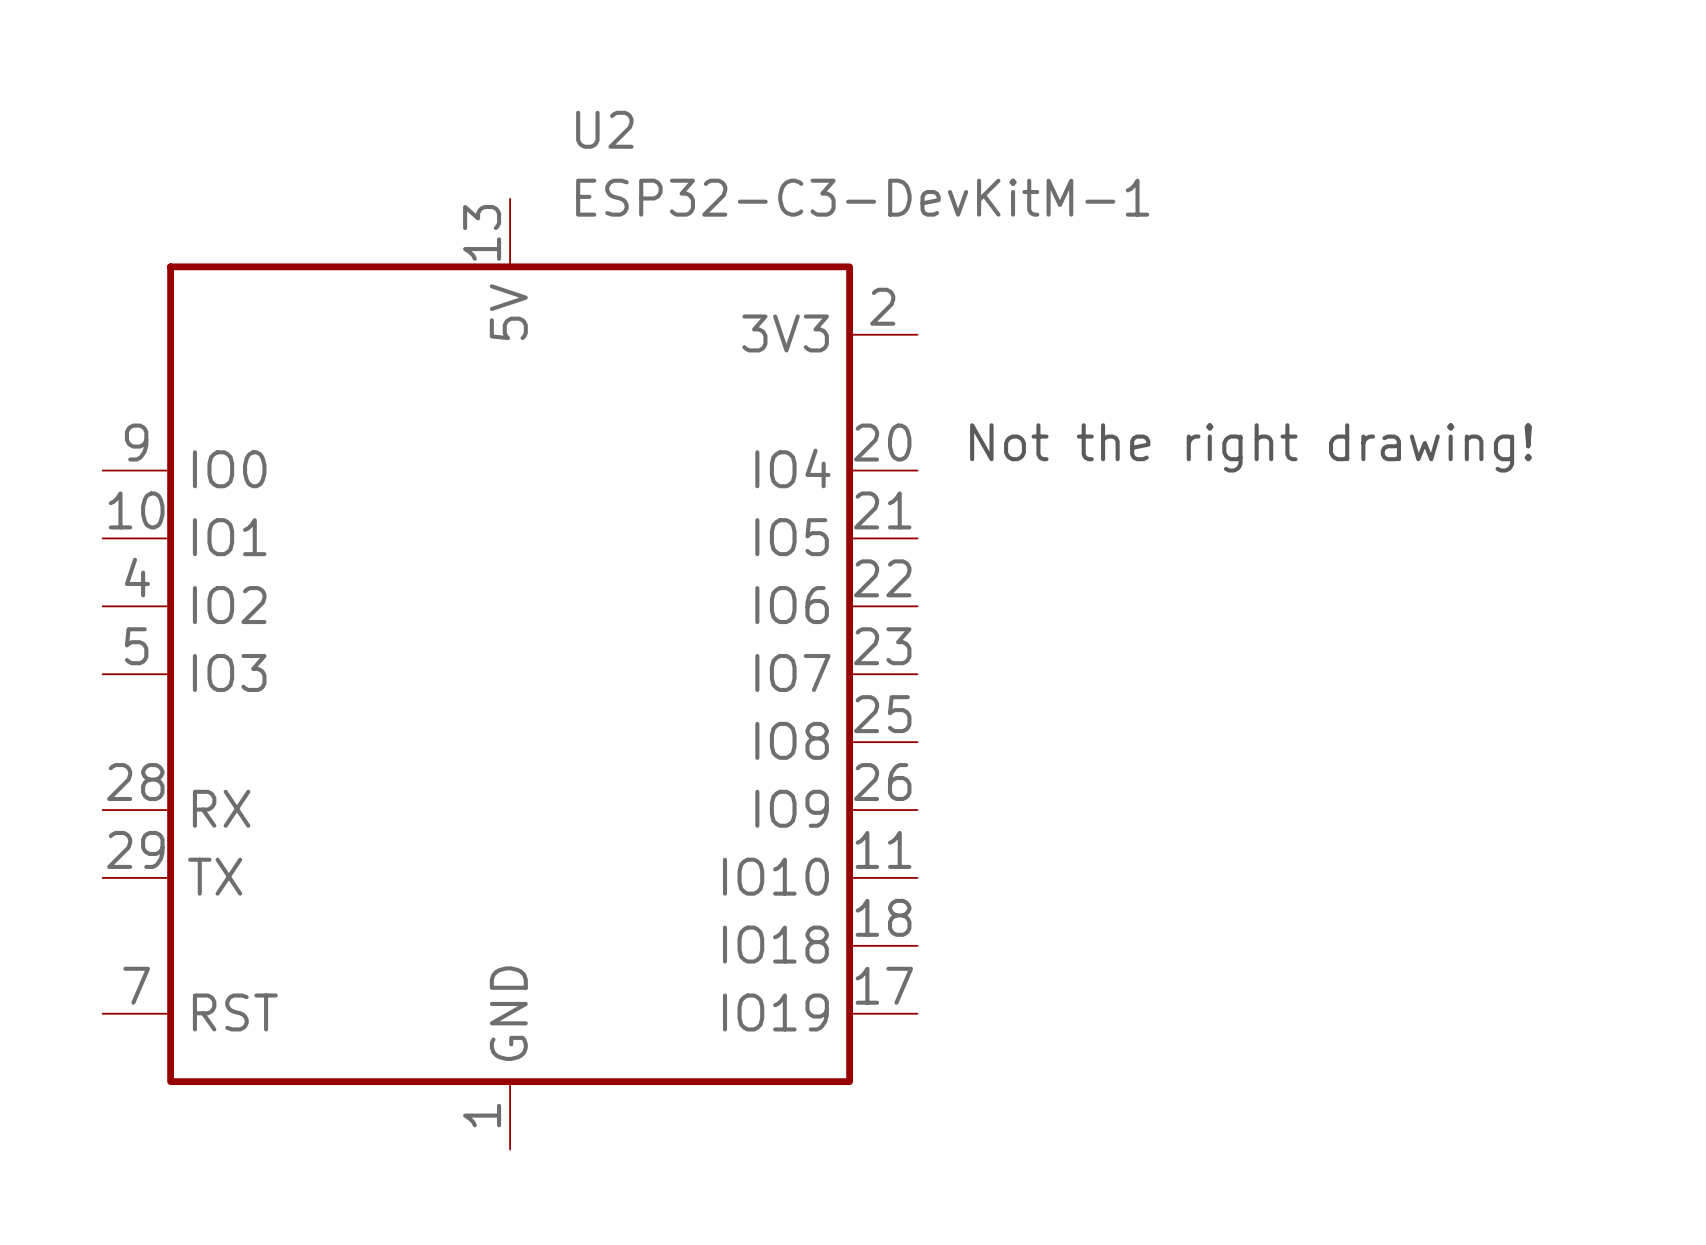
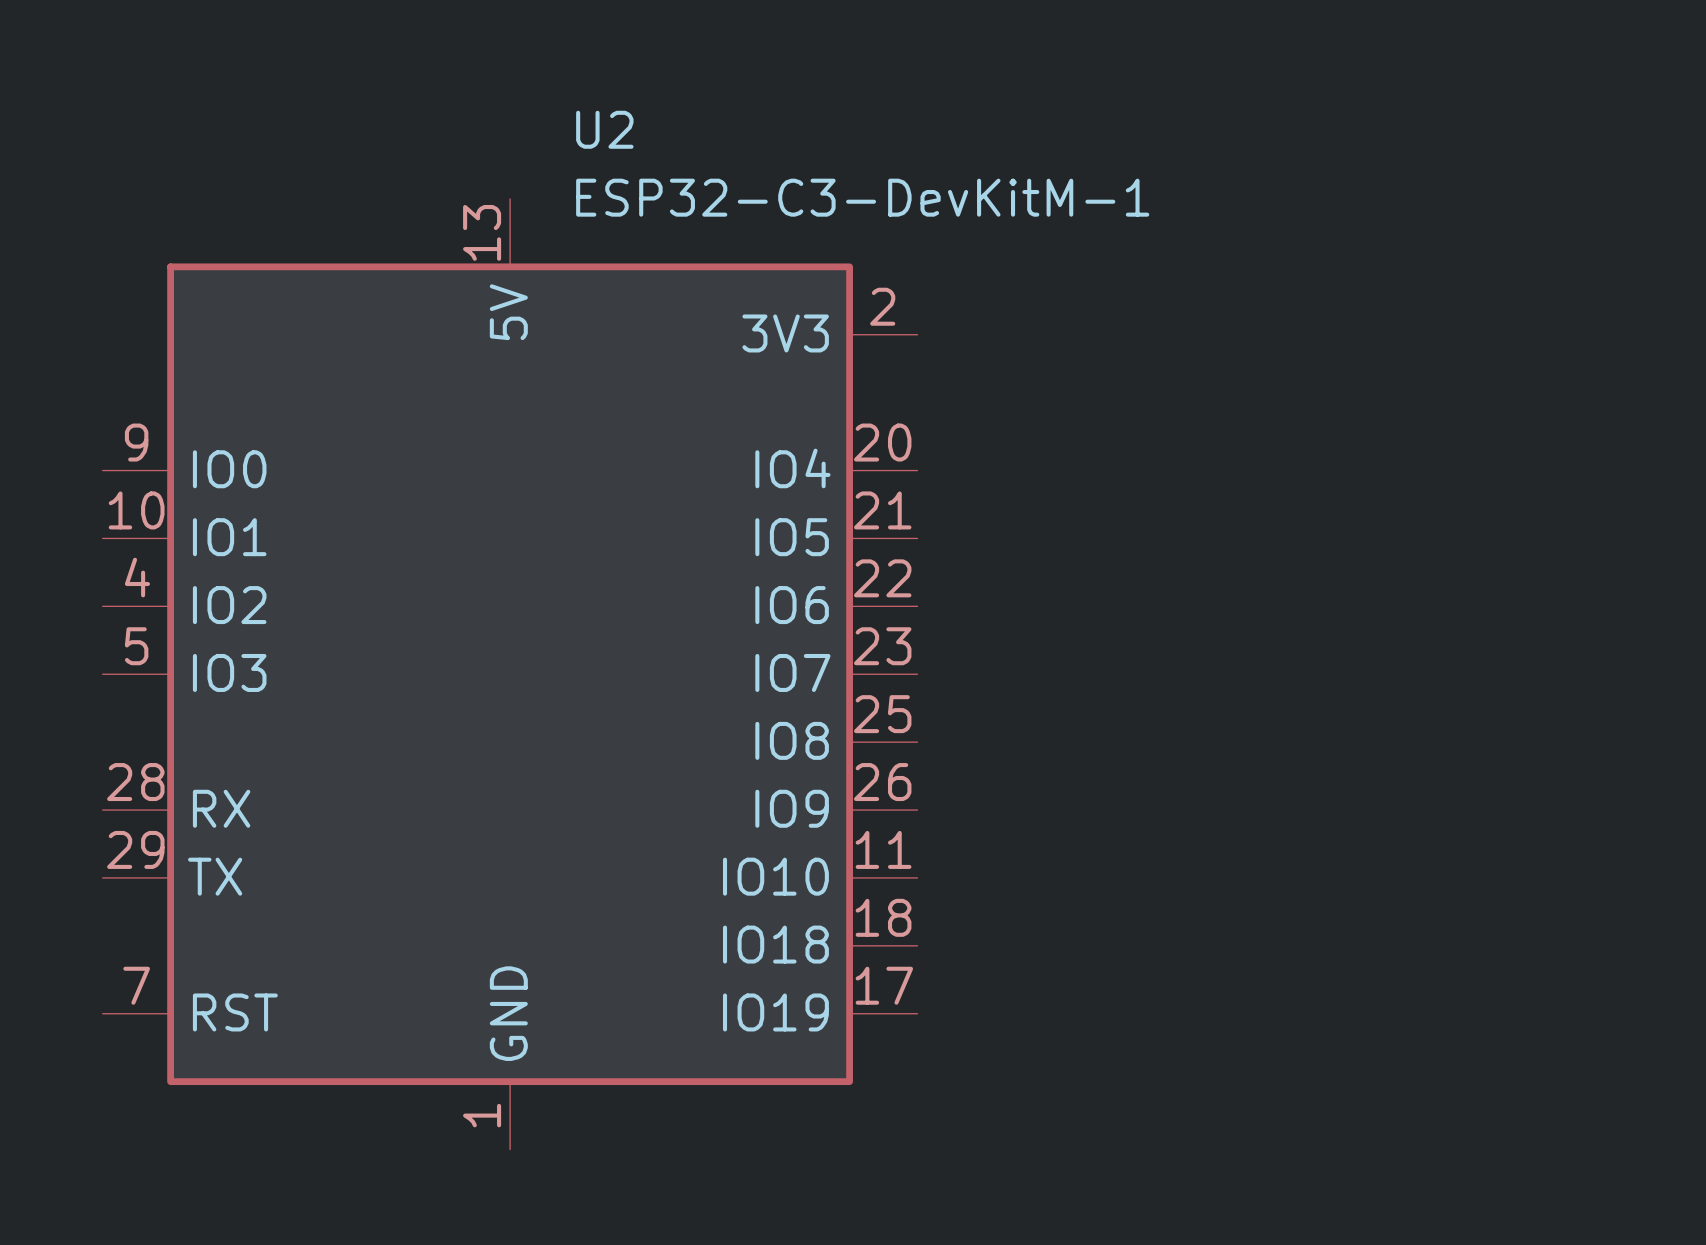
text: Not the right drawing! (1251, 447) -> none

